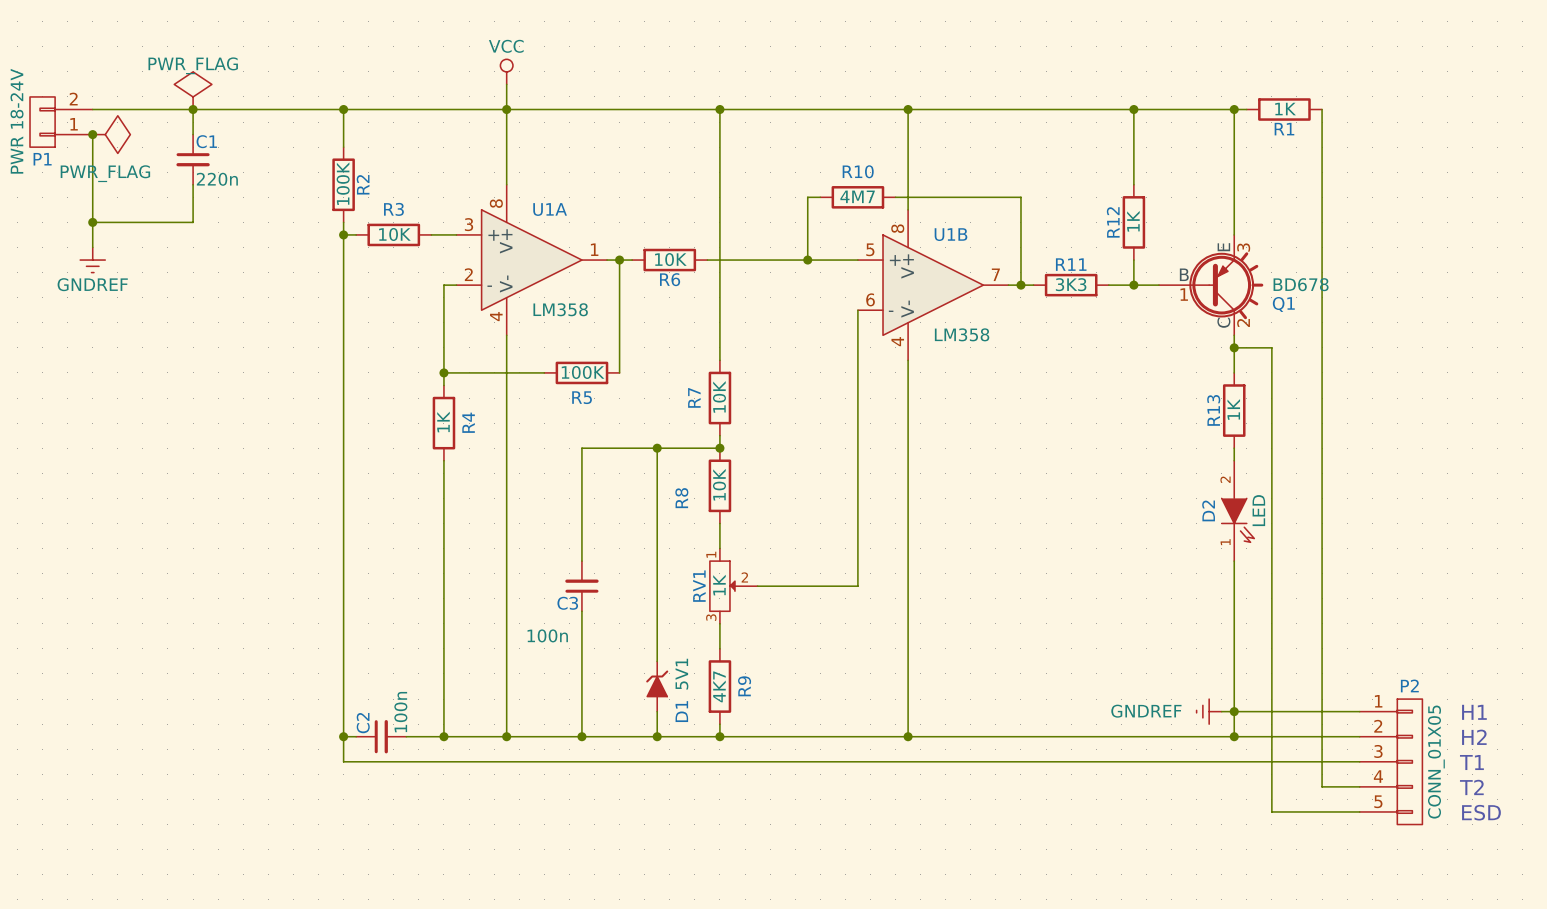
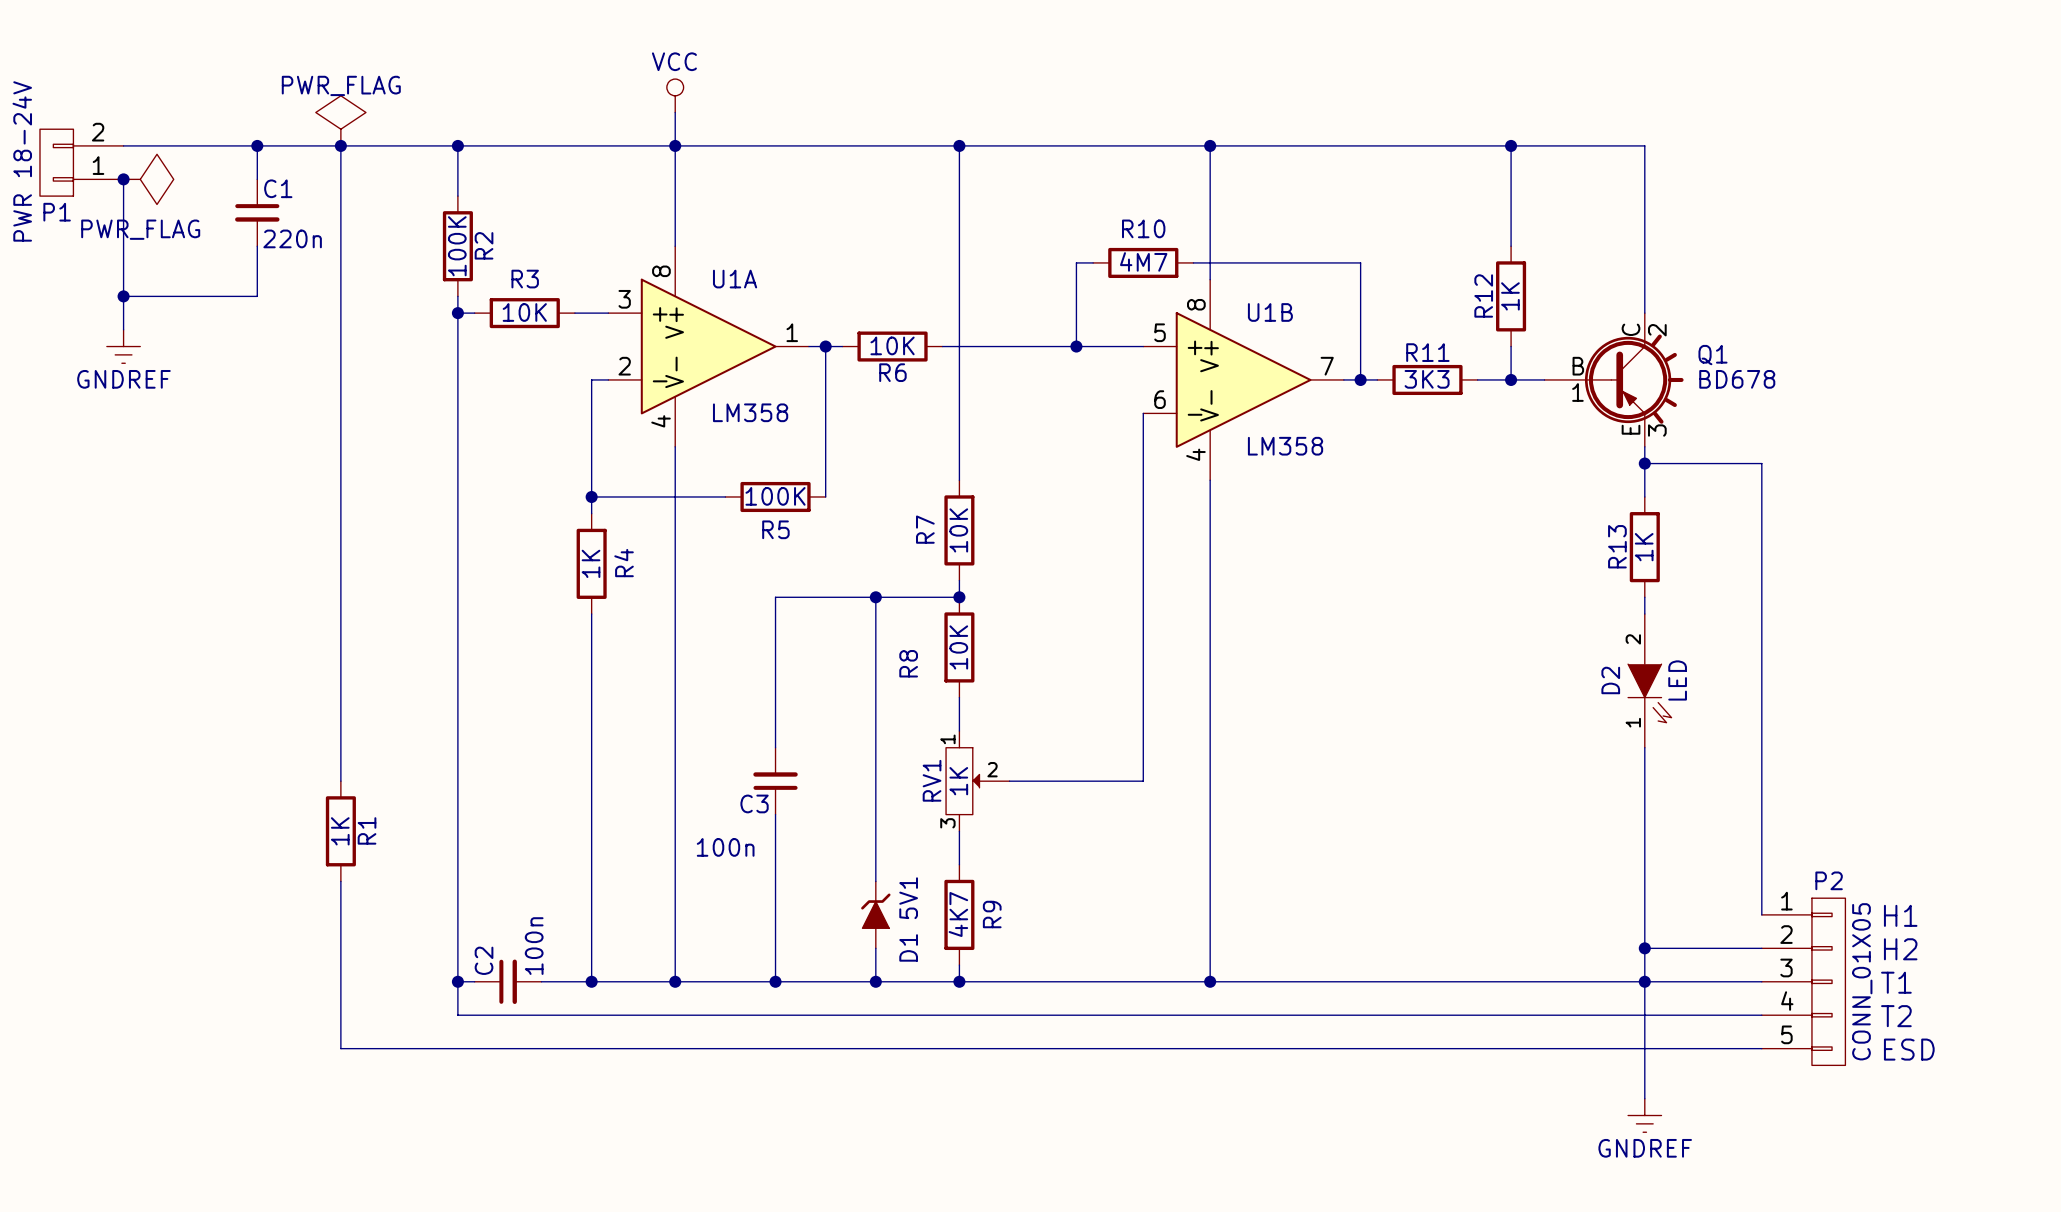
power symbol position: PWR_FLAG (193, 90) -> PWR_FLAG (340, 120)
wire: none -> (340, 145) (340, 781)
junction: none -> (340, 145)
wire: (1234, 109) (1246, 109) -> none
junction: (1234, 109) -> none
R1 rotation: 0° (1284, 109) -> 90° clockwise (340, 831)
R1 position: (1284, 109) -> (340, 831)
wire: (1322, 109) (1322, 347) -> (1694, 463) (1761, 463)
R1 name position: R1 (1284, 129) -> R1 (367, 830)
Q1 flip: as is (1226, 285) -> up-down (1634, 379)
wire: (1271, 347) (1271, 811) (1359, 811) -> none
wire: none -> (340, 881) (340, 1048) (1761, 1048)
wire: (1322, 686) (1322, 786) (1359, 786) -> none
power symbol text position: GNDREF (1146, 711) -> GNDREF (1645, 1148)
power symbol rotation: 0° (1209, 711) -> 90° counterclockwise (1644, 1115)
power symbol position: GNDREF (1209, 711) -> GNDREF (1644, 1115)
wire: (1221, 711) (1234, 711) -> none
text position: H1 (1474, 712) -> H1 (1900, 915)
wire: none -> (1644, 981) (1644, 1098)
text position: H2 (1474, 737) -> H2 (1900, 949)
P2 position: (1391, 761) -> (1803, 981)
text position: T1 (1471, 762) -> T1 (1896, 982)
text position: T2 (1471, 787) -> T2 (1896, 1016)
text position: ESD (1481, 812) -> ESD (1909, 1049)

